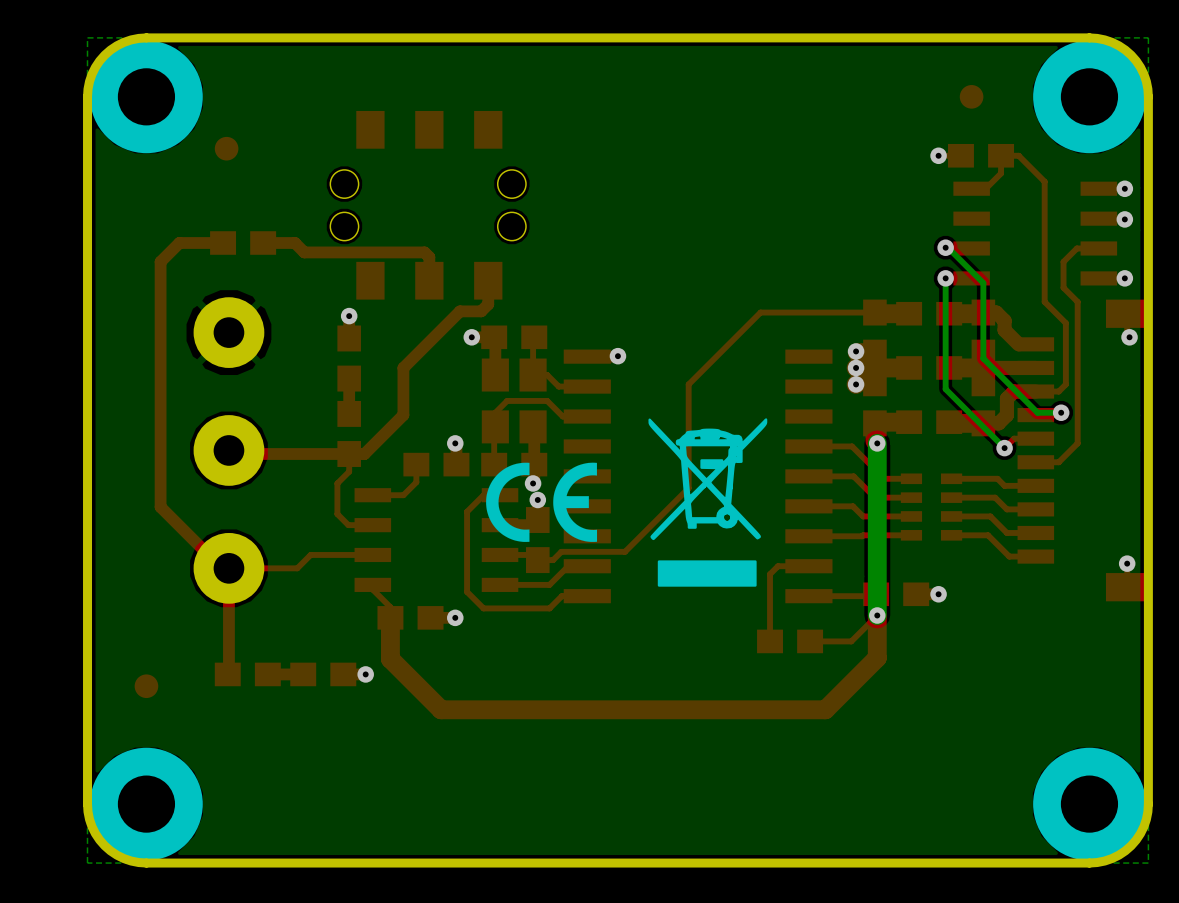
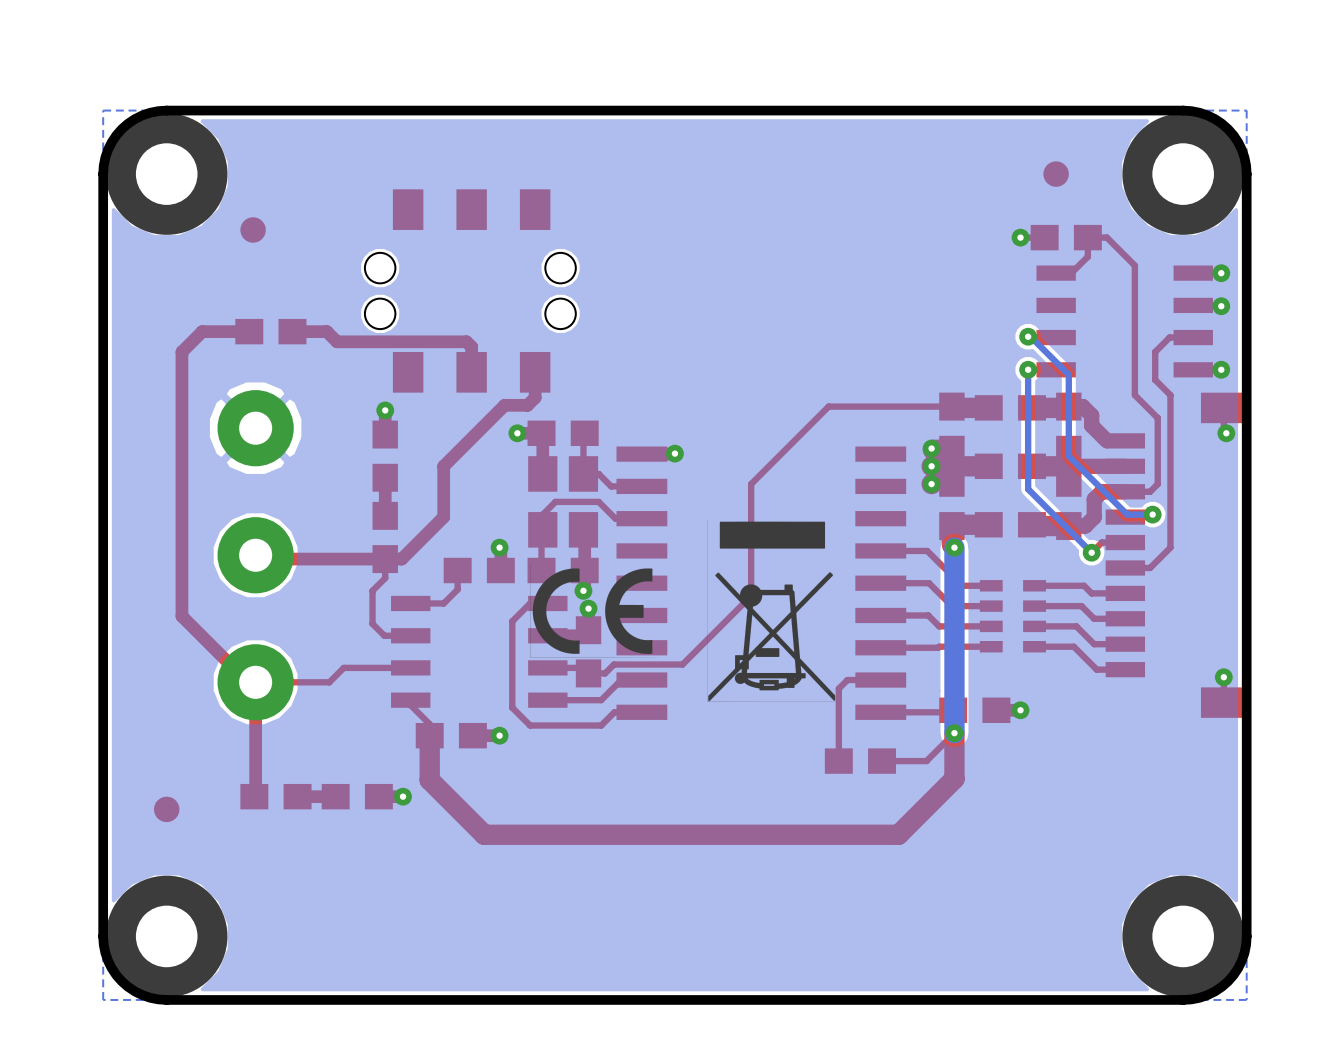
drawing shape: [648, 418, 768, 587] -> [707, 520, 836, 702]
drawing shape: [486, 462, 598, 542] -> [530, 564, 658, 658]

